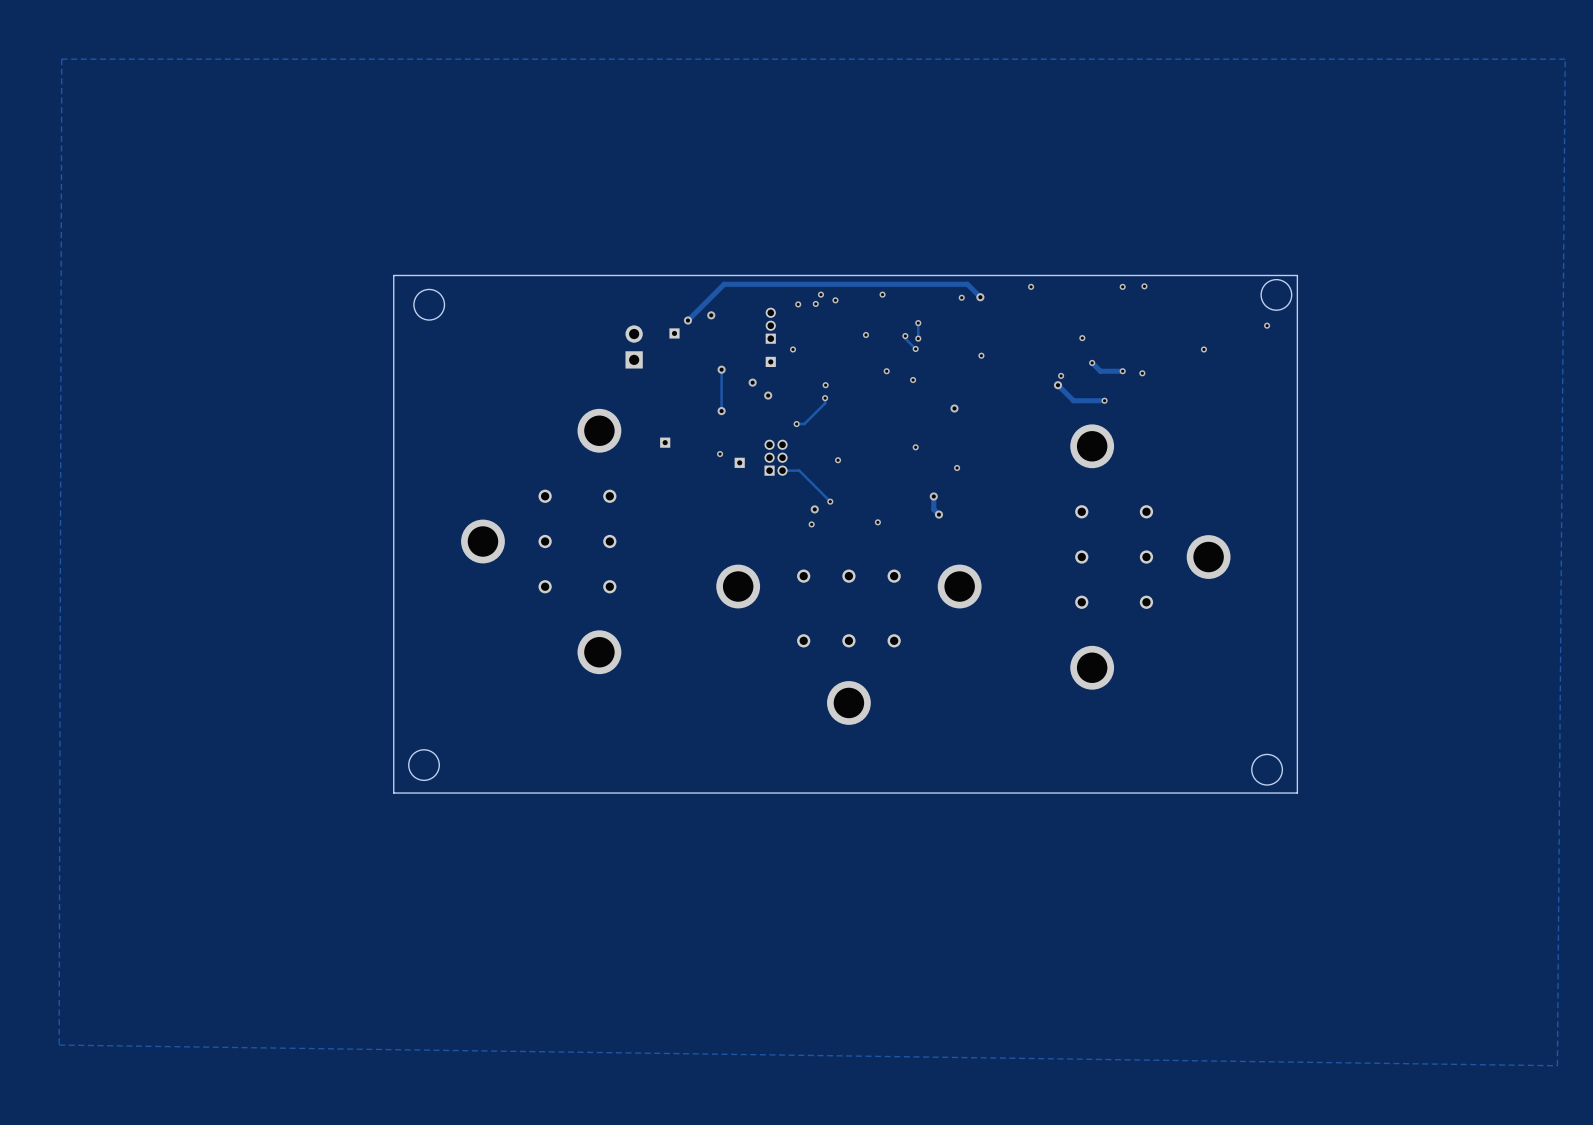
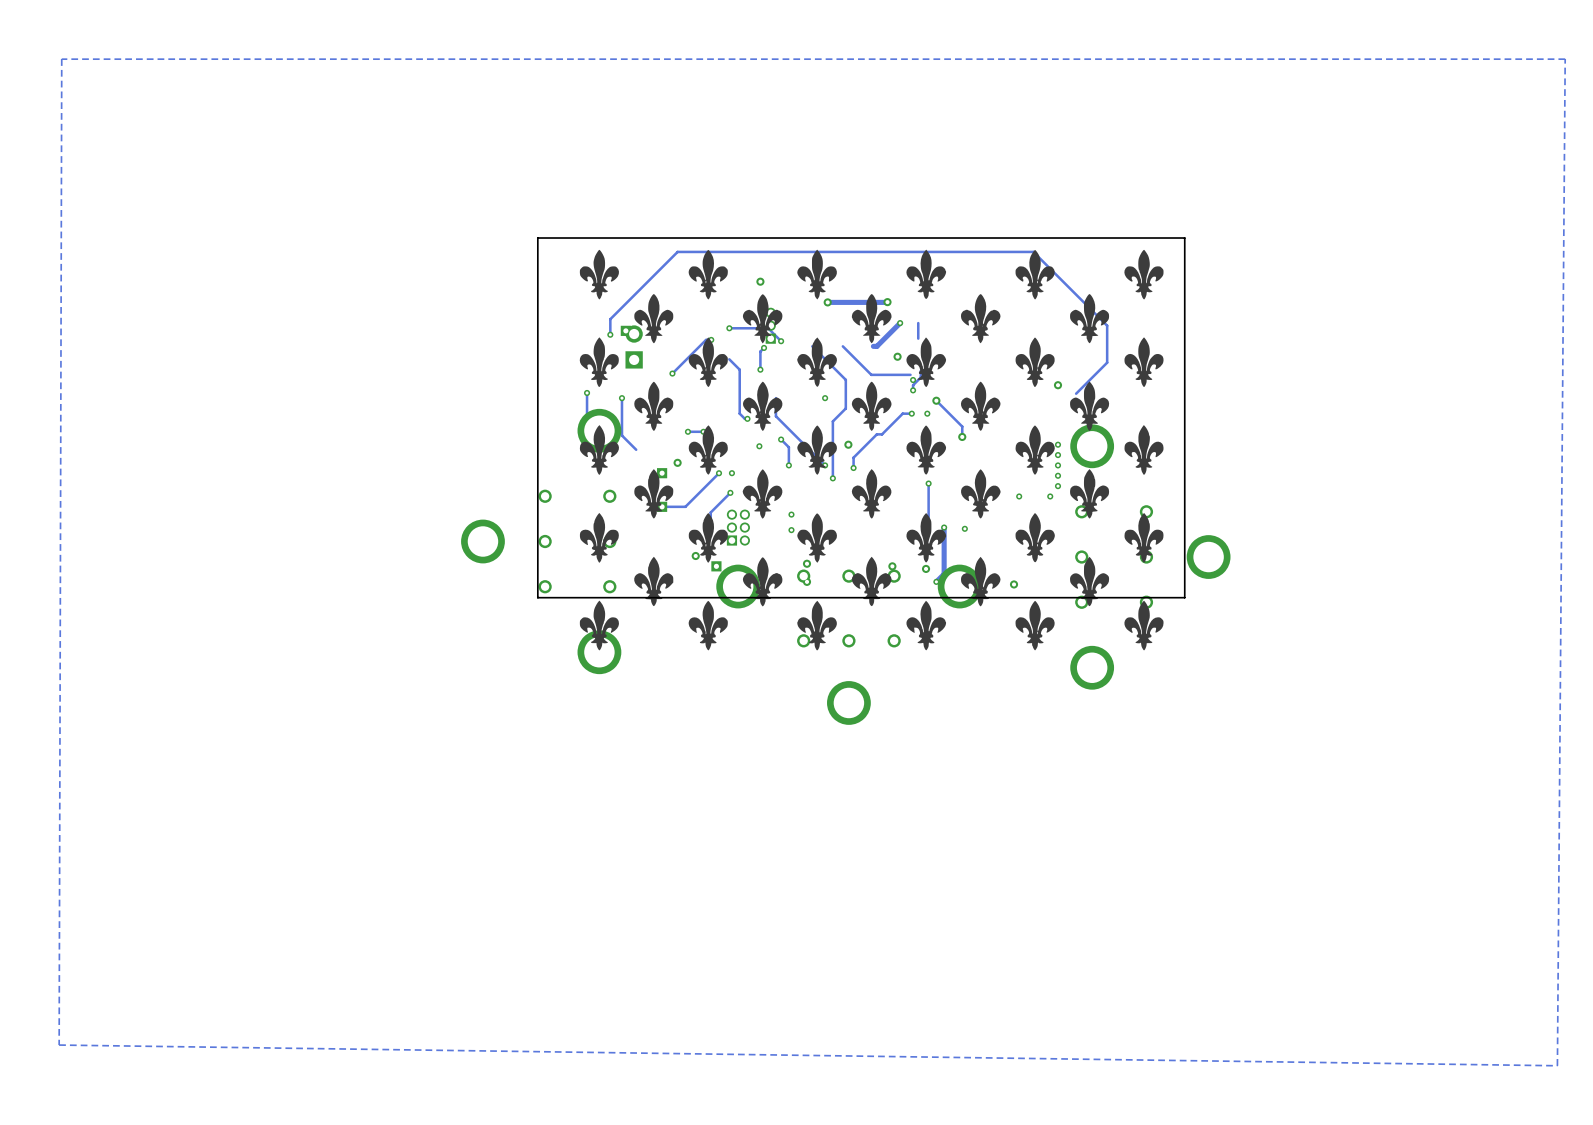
board edge: none -> (1184, 238) (537, 238) (537, 597) (1184, 597) (1184, 238)
drawing: none -> [579, 249, 1164, 651]
board edge: (1297, 275) (393, 275) (393, 793) (1297, 793) (1297, 275) -> none
round board edge: [1260, 279, 1293, 311] -> none
via: none -> (760, 281)
via: (1031, 286) -> none
via: (1122, 286) -> none
via: (1144, 286) -> none
round board edge: [413, 288, 445, 321] -> none
via: (820, 294) -> none
via: (882, 294) -> none
via: (961, 297) -> none
track: (980, 297) (967, 284) (724, 284) (687, 320) -> none
via: (980, 297) -> none
via: (835, 300) -> none
via: none -> (827, 302)
track: none -> (887, 302) (827, 302)
via: none -> (887, 302)
via: (815, 303) -> none
via: (798, 304) -> none
via: (711, 315) -> none
via: (687, 320) -> none
track: none -> (900, 323) (876, 346) (873, 346)
via: none -> (900, 323)
via: (918, 323) -> none
via: (1267, 325) -> none
track: none -> (729, 328) (768, 328) (781, 341)
via: none -> (729, 328)
part position: (674, 333) -> (625, 330)
track: none -> (610, 334) (610, 319) (677, 251) (1033, 251) (1107, 325) (1107, 362) (1076, 393)
via: none -> (610, 334)
via: (865, 335) -> none
track: (905, 336) (905, 338) (915, 348) -> none
via: (905, 336) -> none
via: (918, 338) -> none
via: (1082, 338) -> none
track: none -> (711, 339) (706, 339) (672, 373)
via: none -> (711, 339)
via: none -> (781, 341)
track: none -> (812, 346) (845, 379) (845, 408) (832, 421) (832, 478)
track: none -> (842, 346) (871, 374) (910, 374)
track: none -> (764, 347) (760, 351) (760, 369)
via: none -> (764, 347)
via: (915, 348) -> none
via: (793, 349) -> none
via: (1203, 349) -> none
via: (981, 355) -> none
via: none -> (897, 356)
track: none -> (729, 359) (739, 369) (739, 413) (747, 418)
part: (770, 361) -> none
track: (1092, 362) (1100, 371) (1122, 371) -> none
via: (1092, 362) -> none
track: (721, 369) (721, 411) -> none
via: (721, 369) -> none
via: none -> (760, 369)
track: none -> (920, 370) (920, 377) (913, 385) (913, 390)
via: (886, 371) -> none
via: (1122, 371) -> none
via: none -> (672, 373)
via: (1142, 373) -> none
via: (1061, 375) -> none
via: (752, 382) -> none
via: (825, 385) -> none
track: (1058, 385) (1073, 400) (1104, 400) -> none
via: none -> (913, 390)
track: none -> (587, 392) (587, 426)
via: none -> (587, 392)
via: (768, 395) -> none
track: none -> (621, 398) (621, 435) (636, 449)
via: none -> (621, 398)
track: none -> (775, 398) (775, 416) (825, 465)
track: (825, 398) (825, 403) (804, 424) (796, 424) -> none
track: none -> (936, 400) (962, 426) (962, 436)
via: none -> (936, 400)
via: (1104, 400) -> none
via: (954, 408) -> none
via: (721, 411) -> none
via: none -> (911, 413)
track: none -> (913, 413) (902, 413) (882, 434) (876, 434) (853, 457) (853, 468)
via: none -> (927, 413)
via: none -> (747, 418)
via: (796, 424) -> none
via: none -> (687, 431)
track: none -> (703, 431) (687, 431)
via: none -> (703, 431)
via: none -> (962, 436)
track: none -> (781, 439) (788, 447) (788, 465)
via: none -> (781, 439)
part position: (665, 442) -> (662, 473)
via: none -> (848, 444)
via: none -> (1058, 444)
via: none -> (759, 446)
via: (915, 447) -> none
via: (720, 454) -> none
via: none -> (1058, 455)
part position: (776, 457) -> (738, 527)
via: (838, 460) -> none
via: none -> (677, 462)
part: (739, 462) -> none
via: none -> (788, 465)
via: none -> (825, 465)
via: none -> (1058, 465)
via: none -> (853, 468)
via: (957, 468) -> none
track: (782, 470) (799, 470) (830, 501) -> none
track: none -> (719, 473) (685, 506) (662, 506)
via: none -> (719, 473)
via: none -> (731, 473)
via: none -> (1058, 475)
via: none -> (832, 478)
track: none -> (928, 483) (928, 517)
via: none -> (928, 483)
via: none -> (1058, 486)
track: none -> (730, 492) (710, 512) (710, 527)
via: none -> (730, 492)
track: (933, 496) (933, 509) (938, 514) -> none
via: (933, 496) -> none
via: none -> (1019, 496)
via: none -> (1050, 496)
via: (830, 501) -> none
part: none -> (662, 506)
via: (814, 509) -> none
via: none -> (791, 514)
via: (938, 514) -> none
via: (877, 522) -> none
via: (811, 524) -> none
track: none -> (944, 527) (944, 574) (936, 581)
via: none -> (944, 527)
via: none -> (964, 528)
via: none -> (791, 530)
via: none -> (695, 555)
via: none -> (806, 563)
part: none -> (716, 566)
via: none -> (892, 566)
via: none -> (926, 568)
via: none -> (806, 581)
via: none -> (936, 581)
via: none -> (1014, 584)
round board edge: [408, 749, 440, 781] -> none
round board edge: [1251, 753, 1283, 786] -> none

